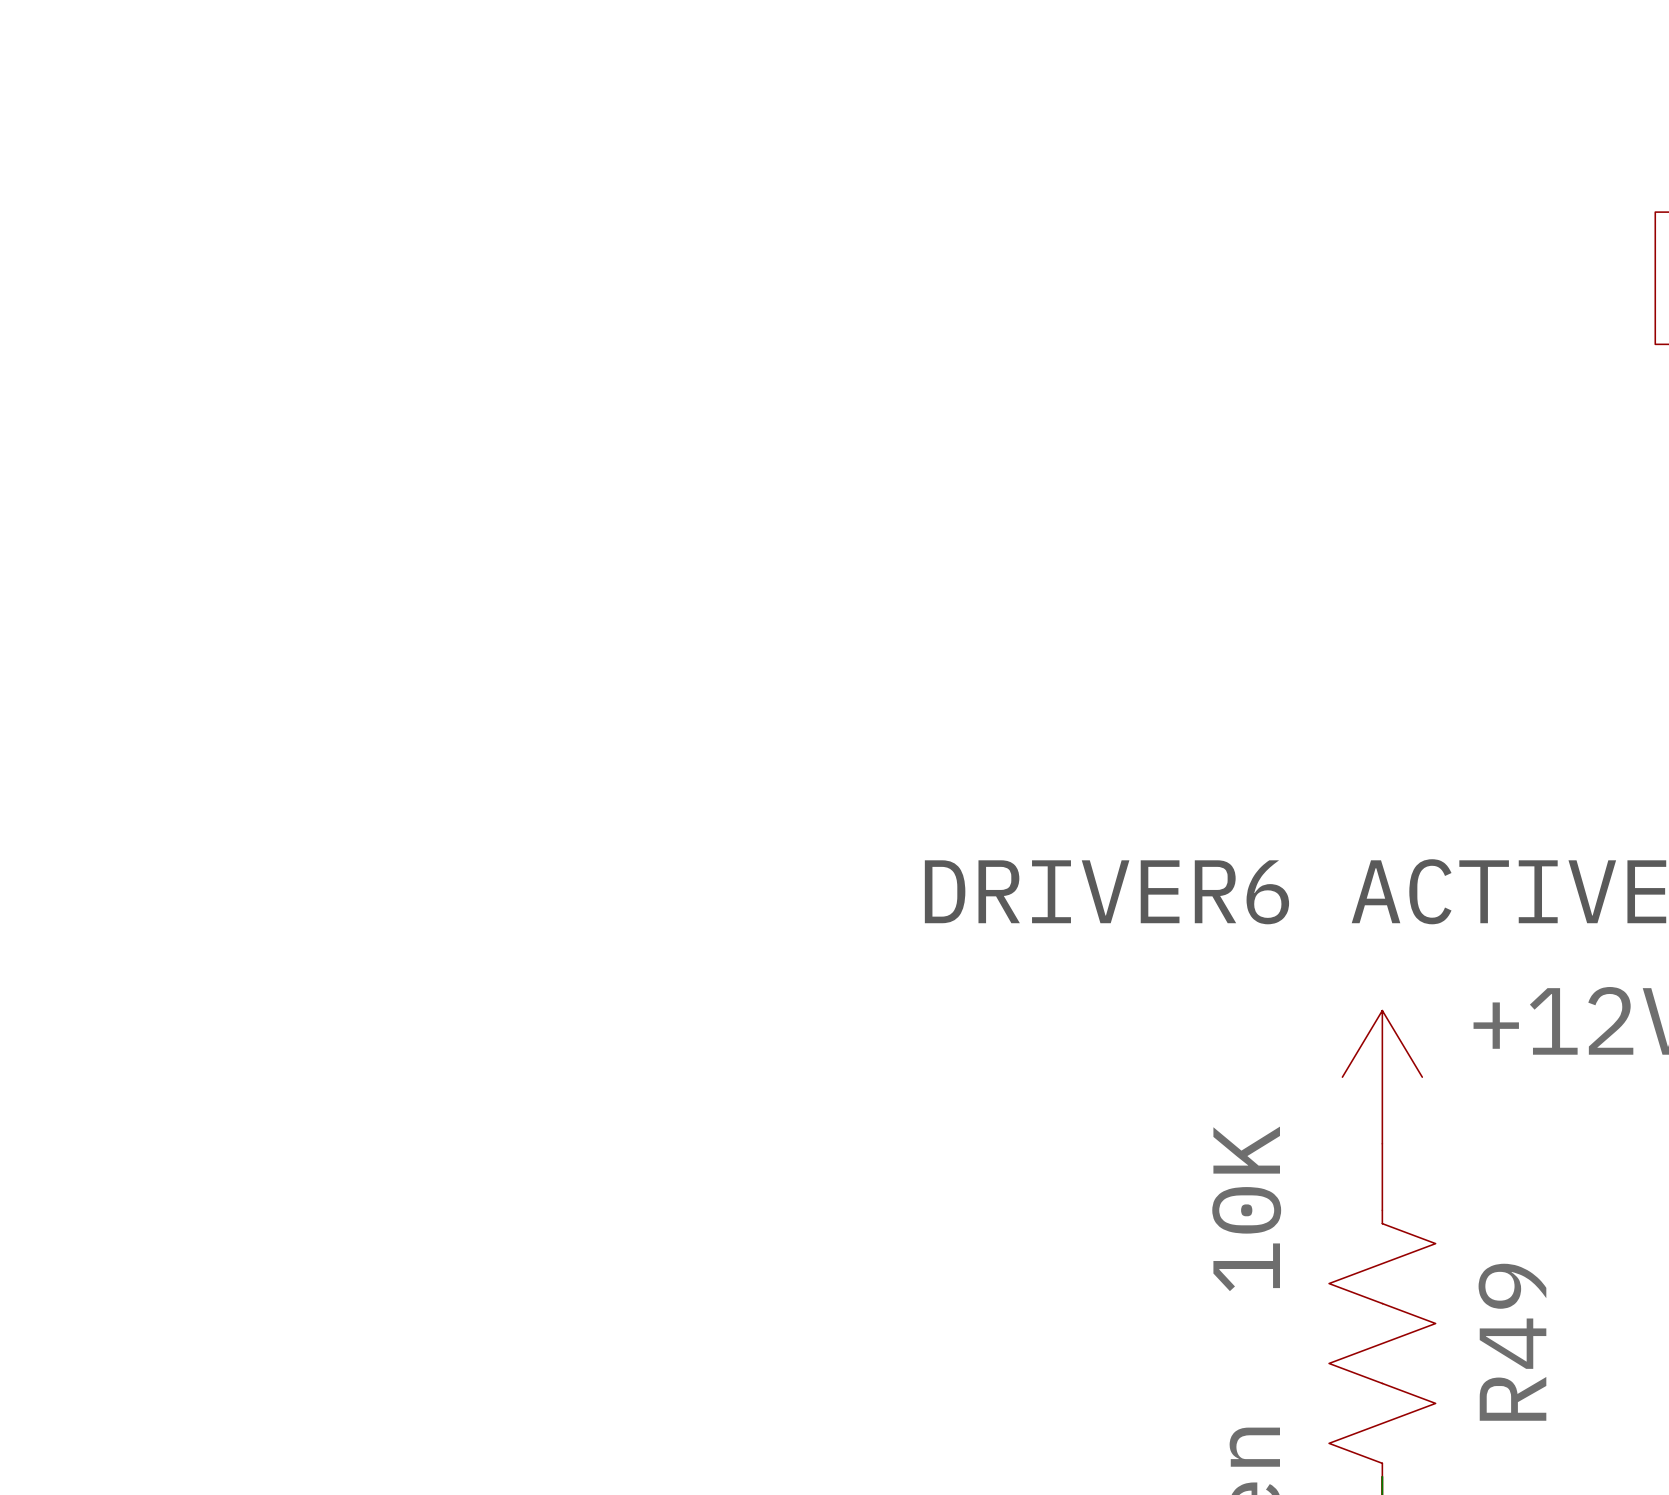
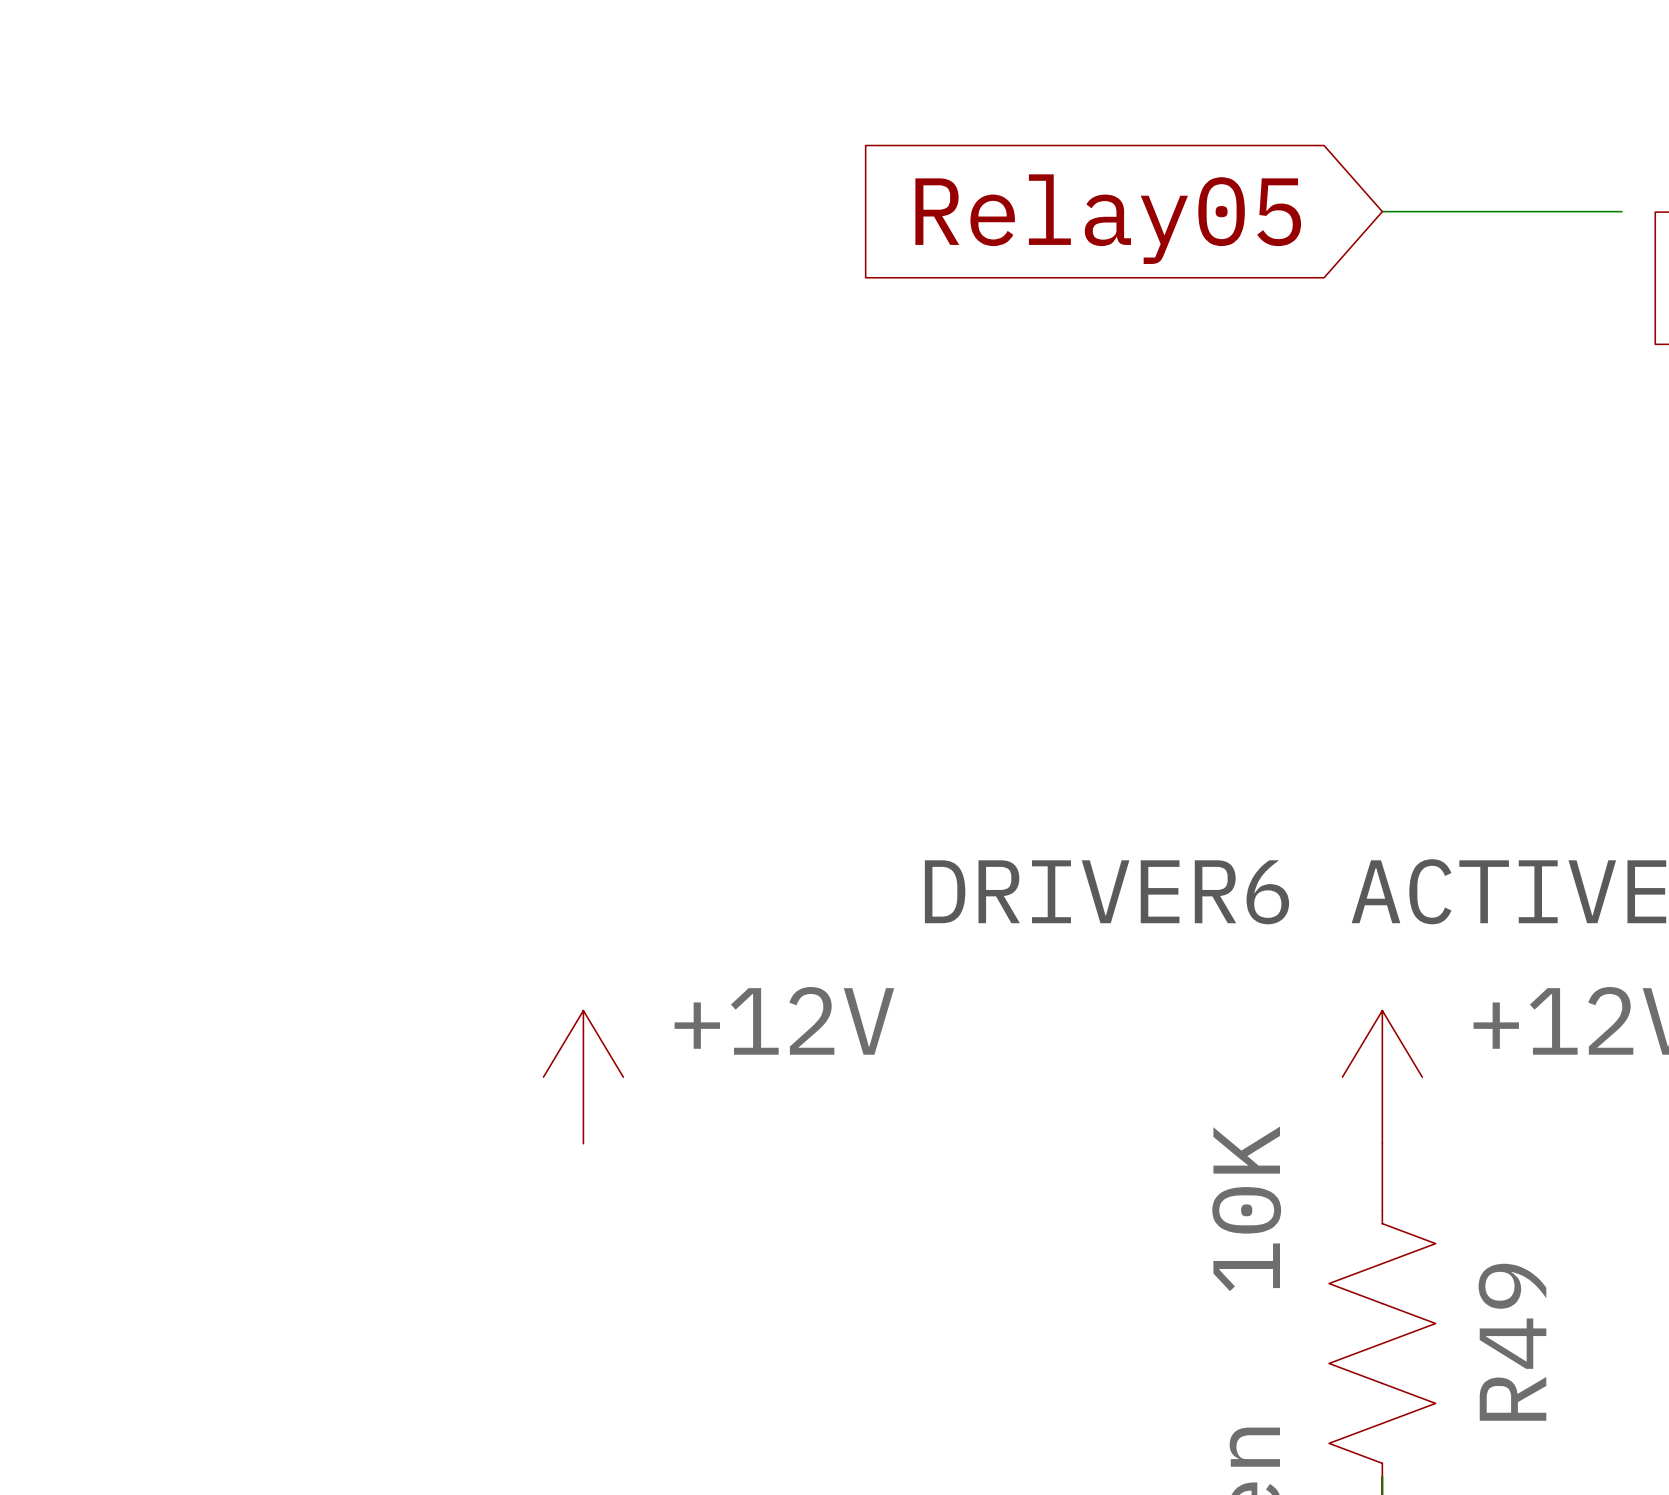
wire: none -> (1382, 211) (1622, 211)
global label: none -> Relay05 (1108, 219)
power symbol: none -> +12V (583, 1077)

